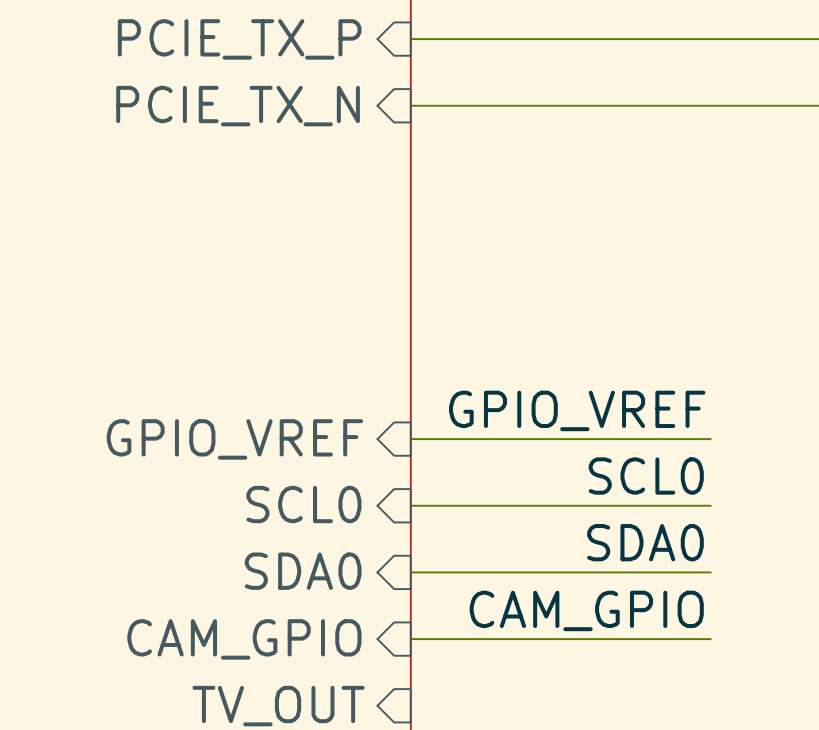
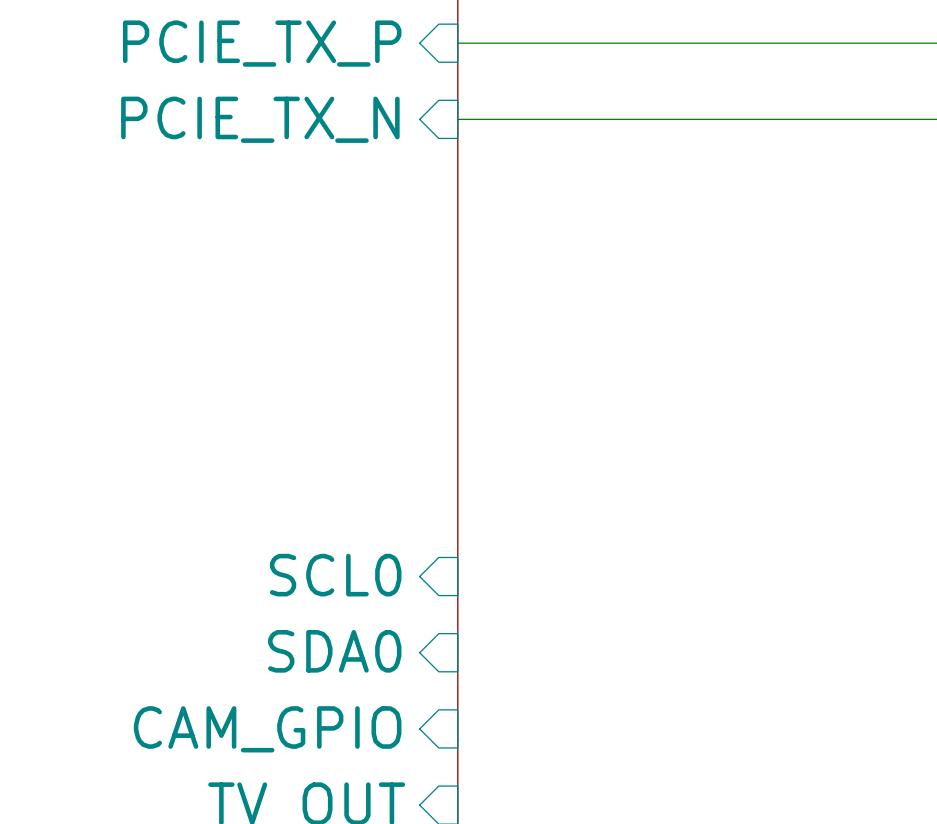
label: GPIO_VREF (577, 410) -> none
sheet pin: GPIO_VREF (234, 439) -> none
wire: (410, 439) (710, 439) -> none
label: SCL0 (646, 476) -> none
wire: (410, 505) (710, 505) -> none
label: SDA0 (645, 542) -> none
wire: (410, 572) (710, 572) -> none
label: CAM_GPIO (586, 610) -> none
wire: (410, 639) (710, 639) -> none

